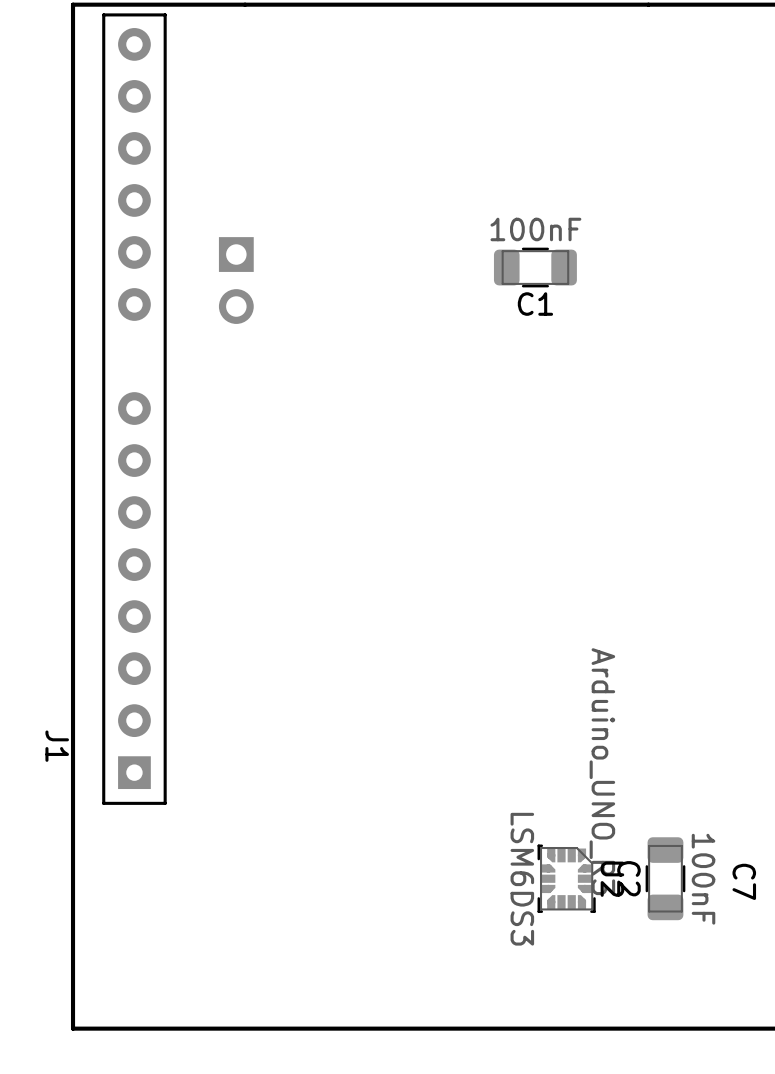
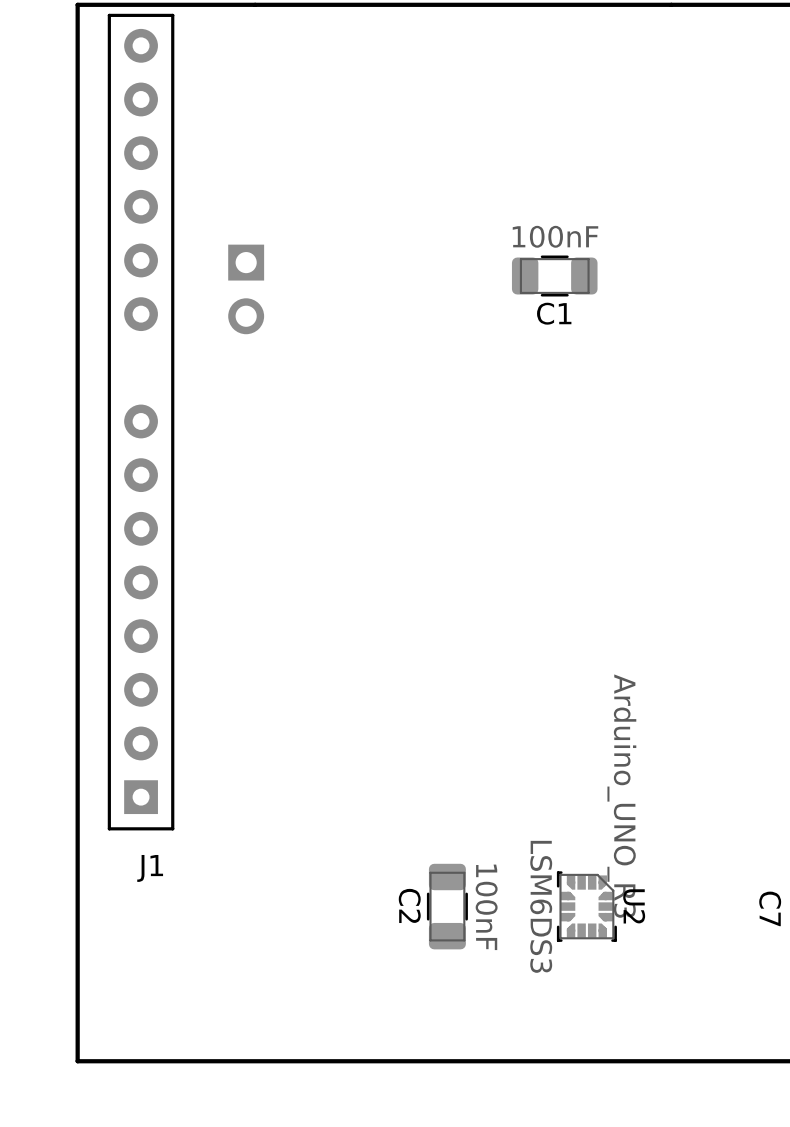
J1 name rotation: 0° (57, 746) -> 90° counterclockwise (150, 868)
J1 name position: J1 (57, 746) -> J1 (150, 868)
C2 position: (665, 878) -> (447, 906)

